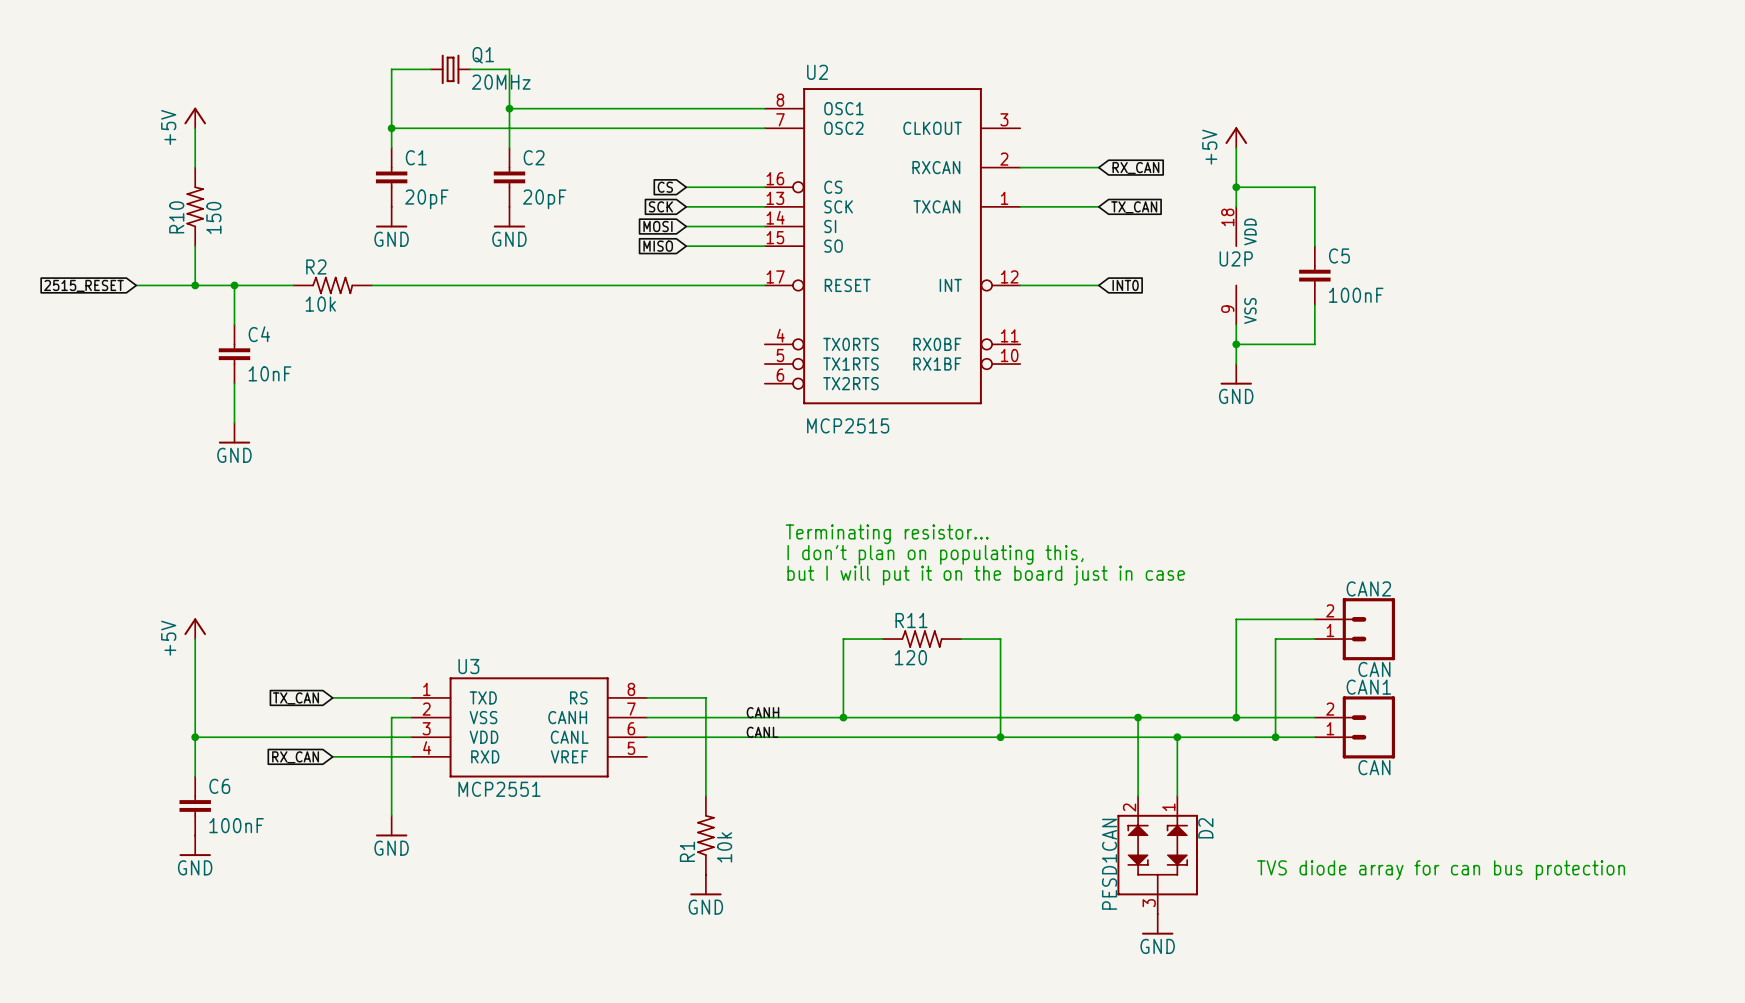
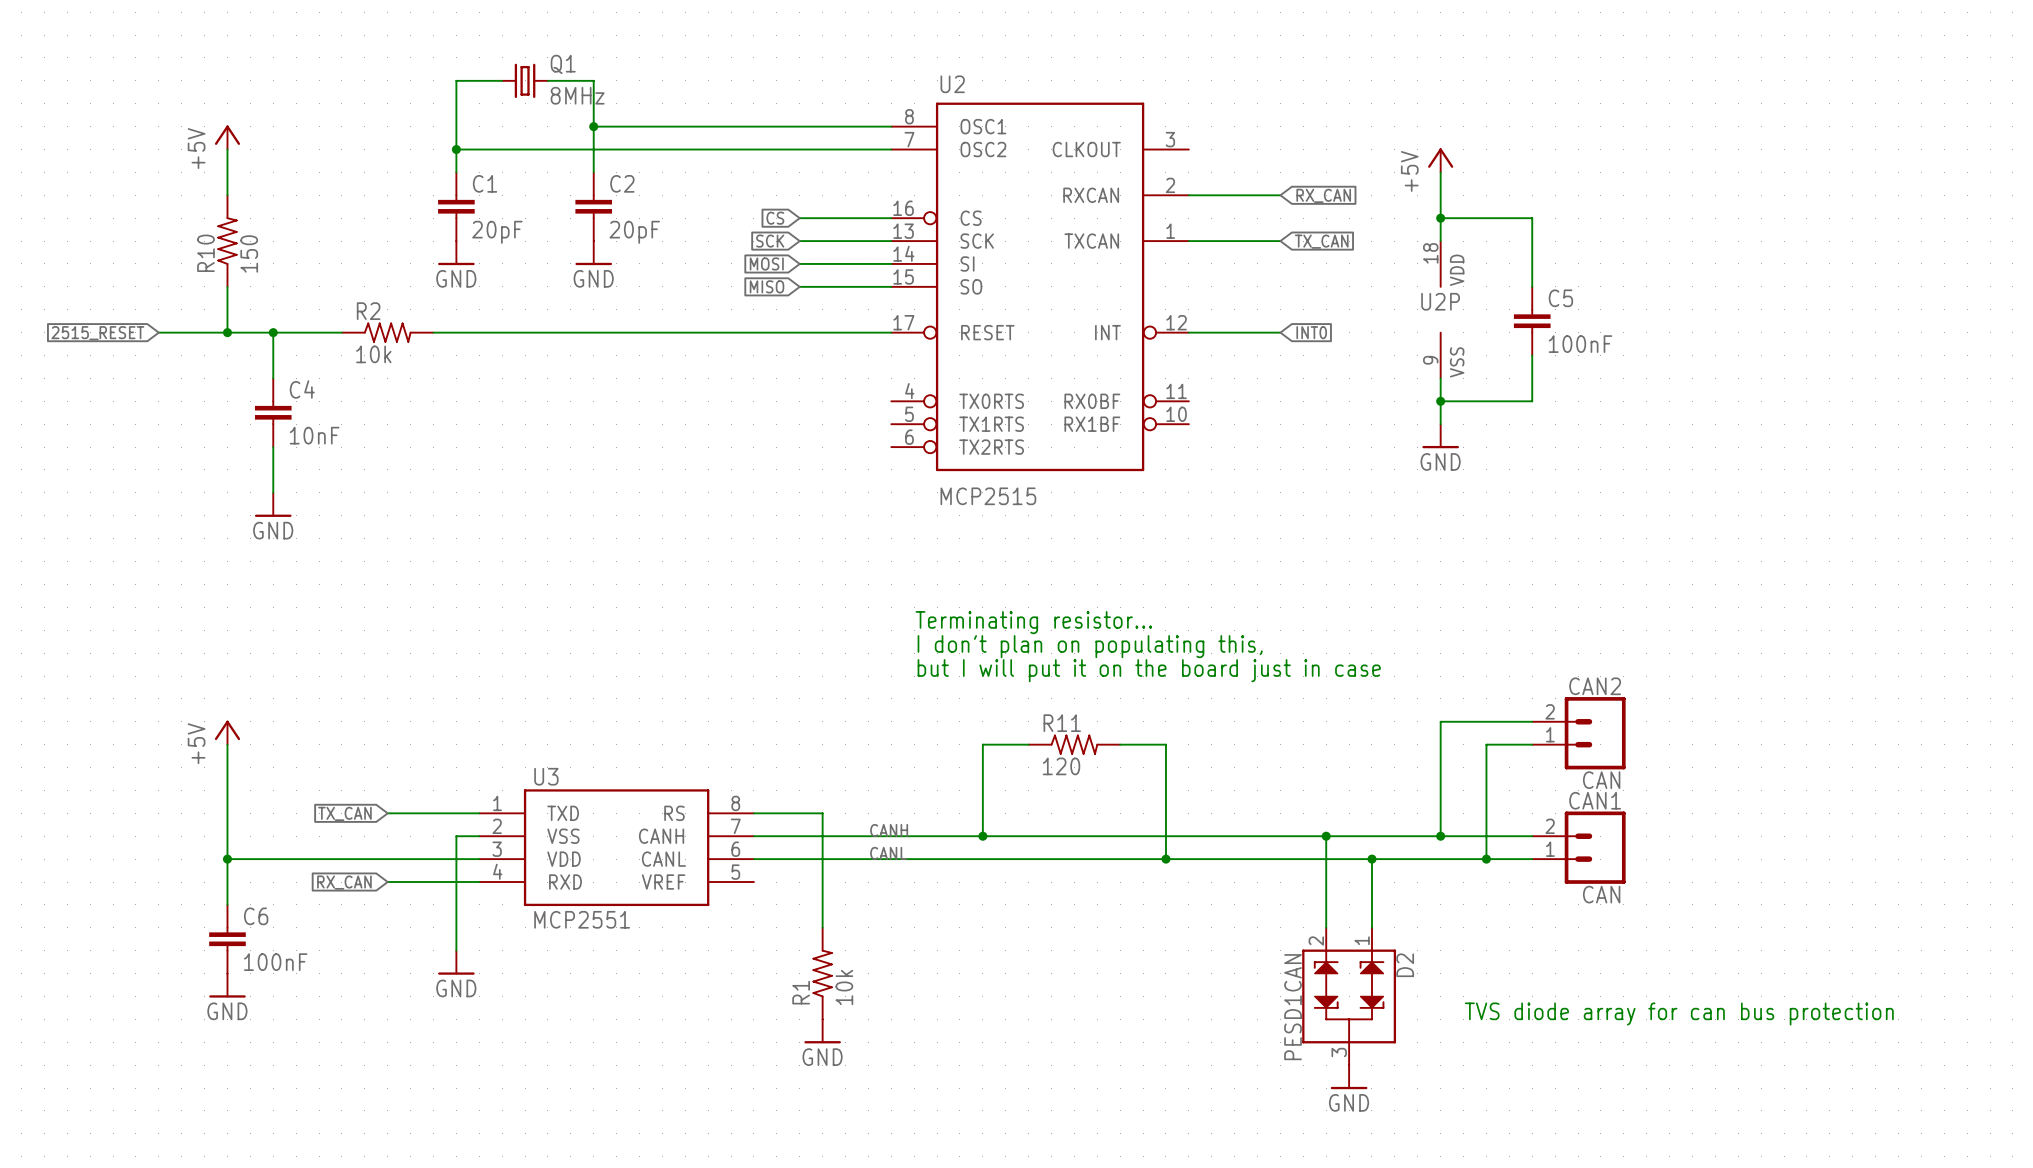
Q1 value: 20MHz (501, 82) -> 8MHz (577, 95)

